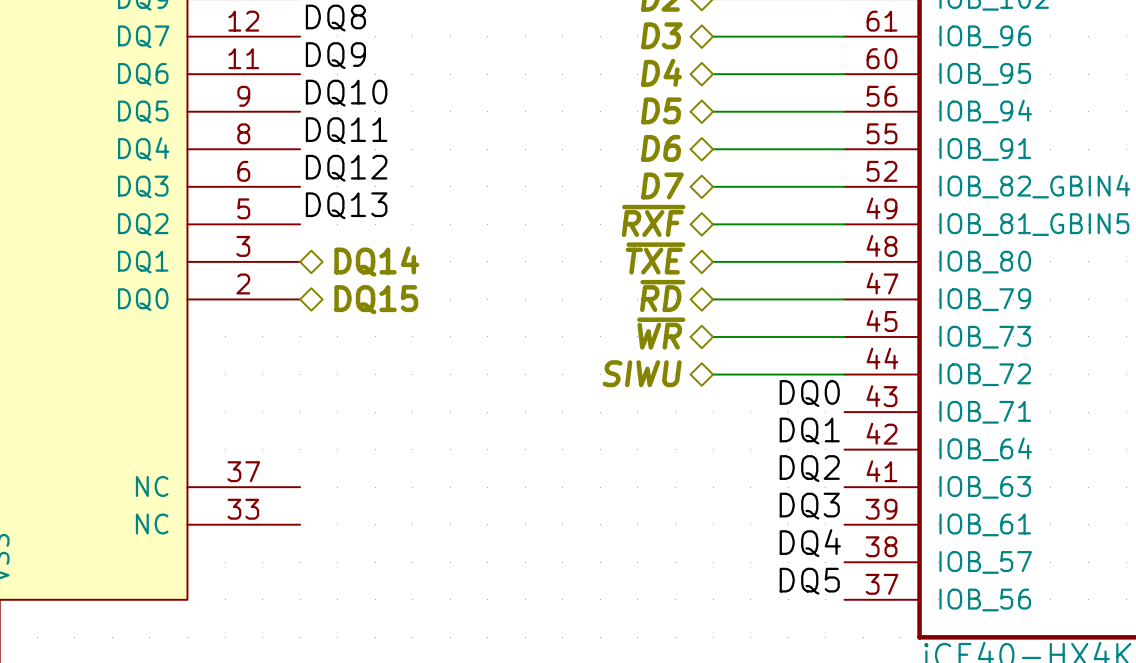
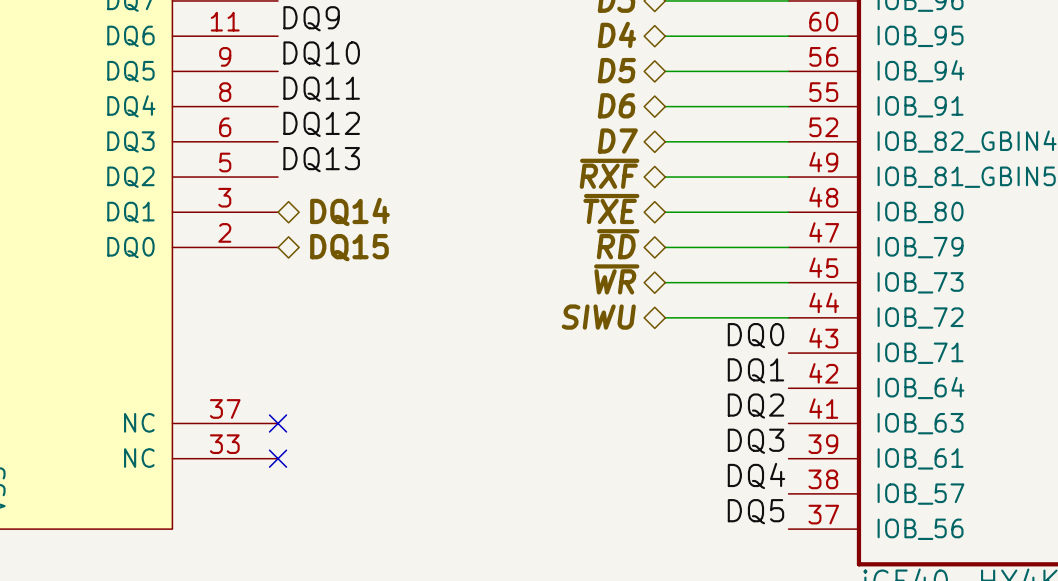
no-connect mark: none -> (278, 423)
no-connect mark: none -> (278, 458)

